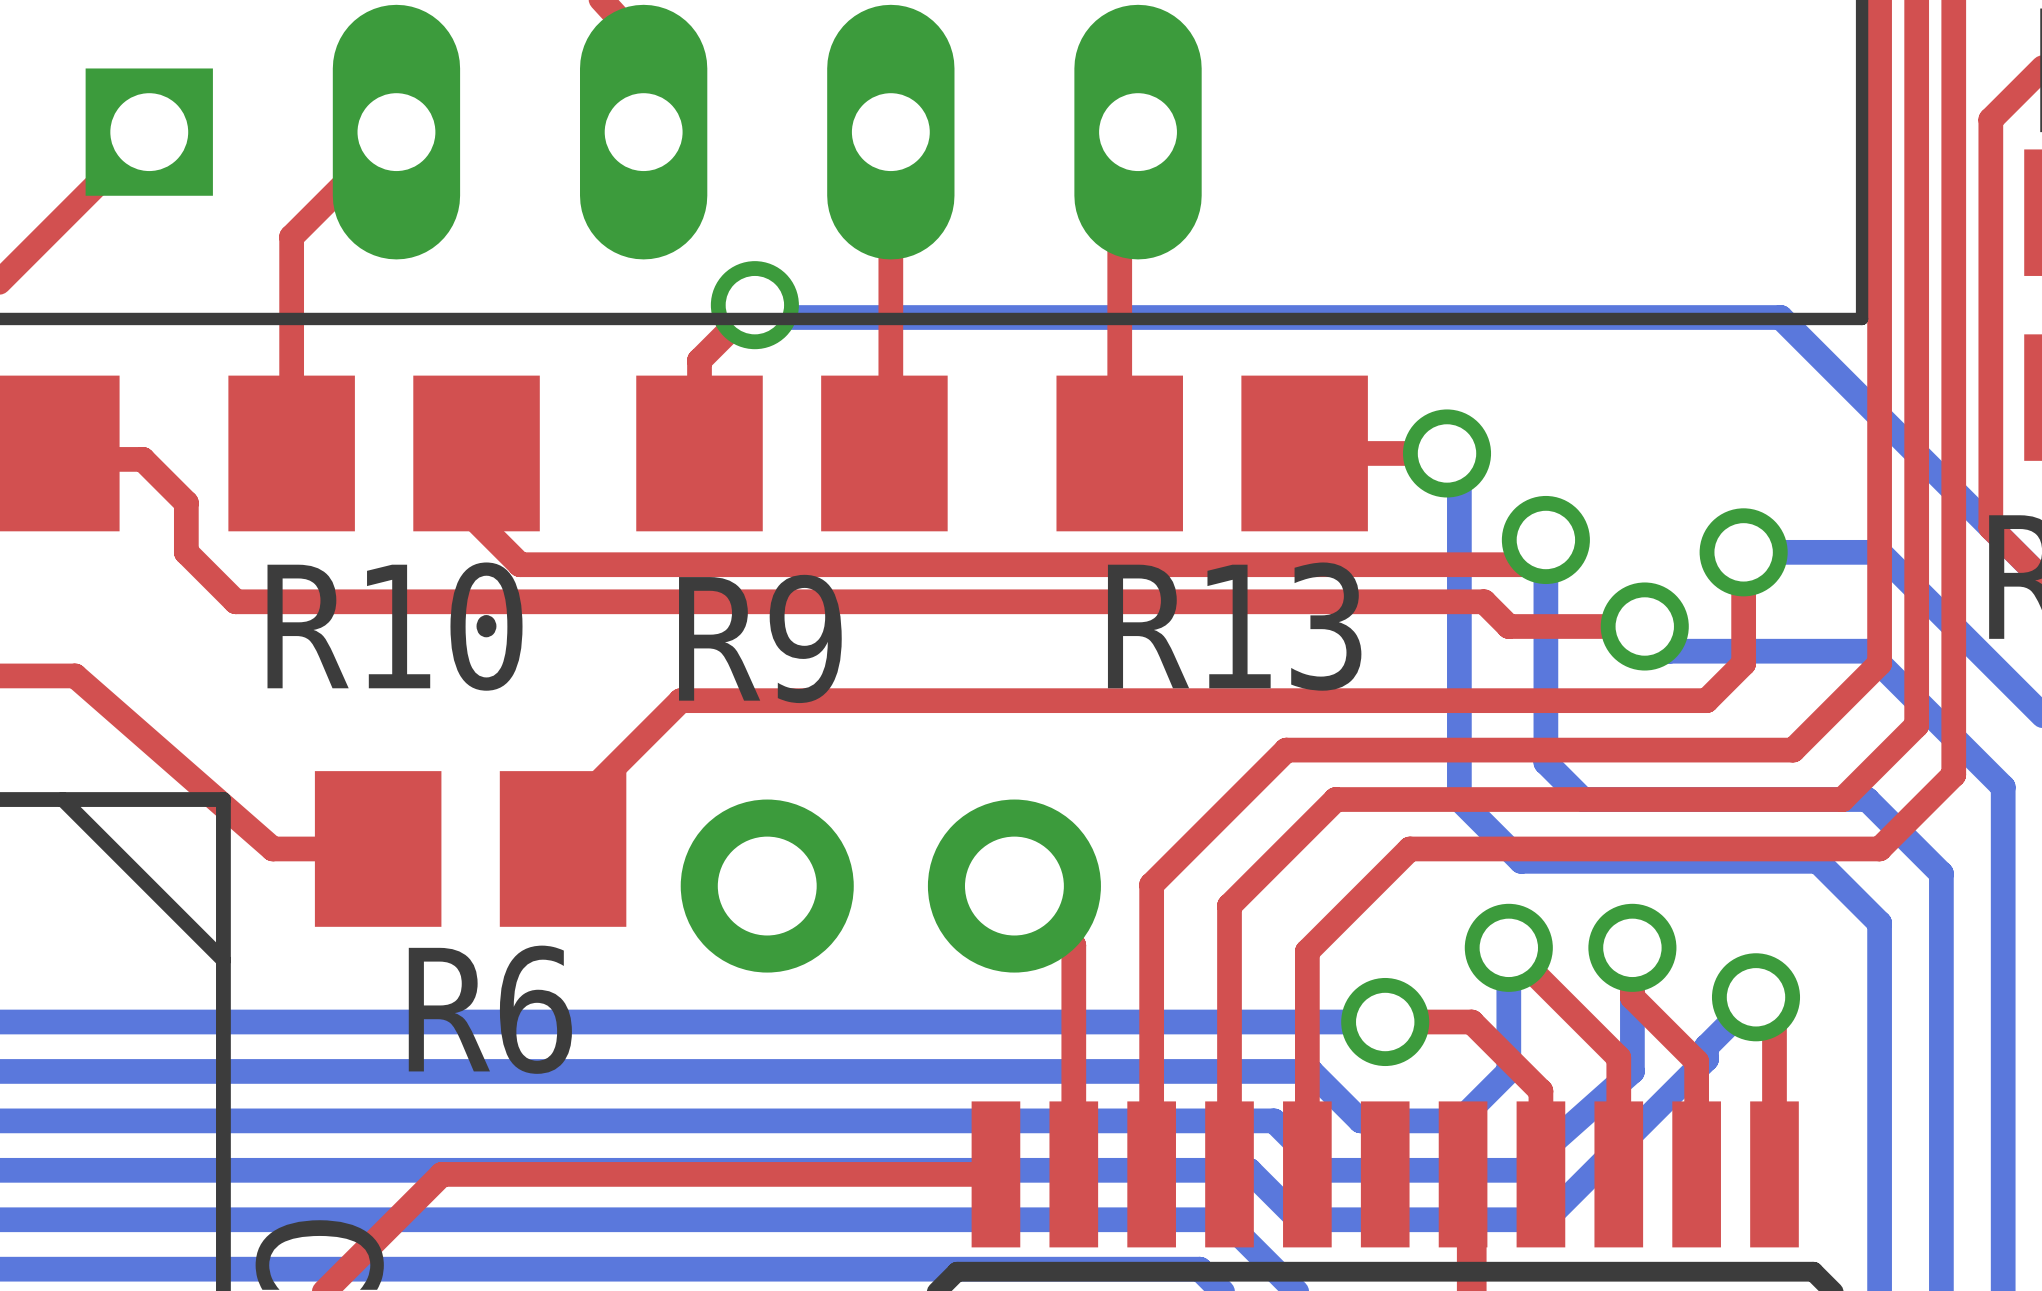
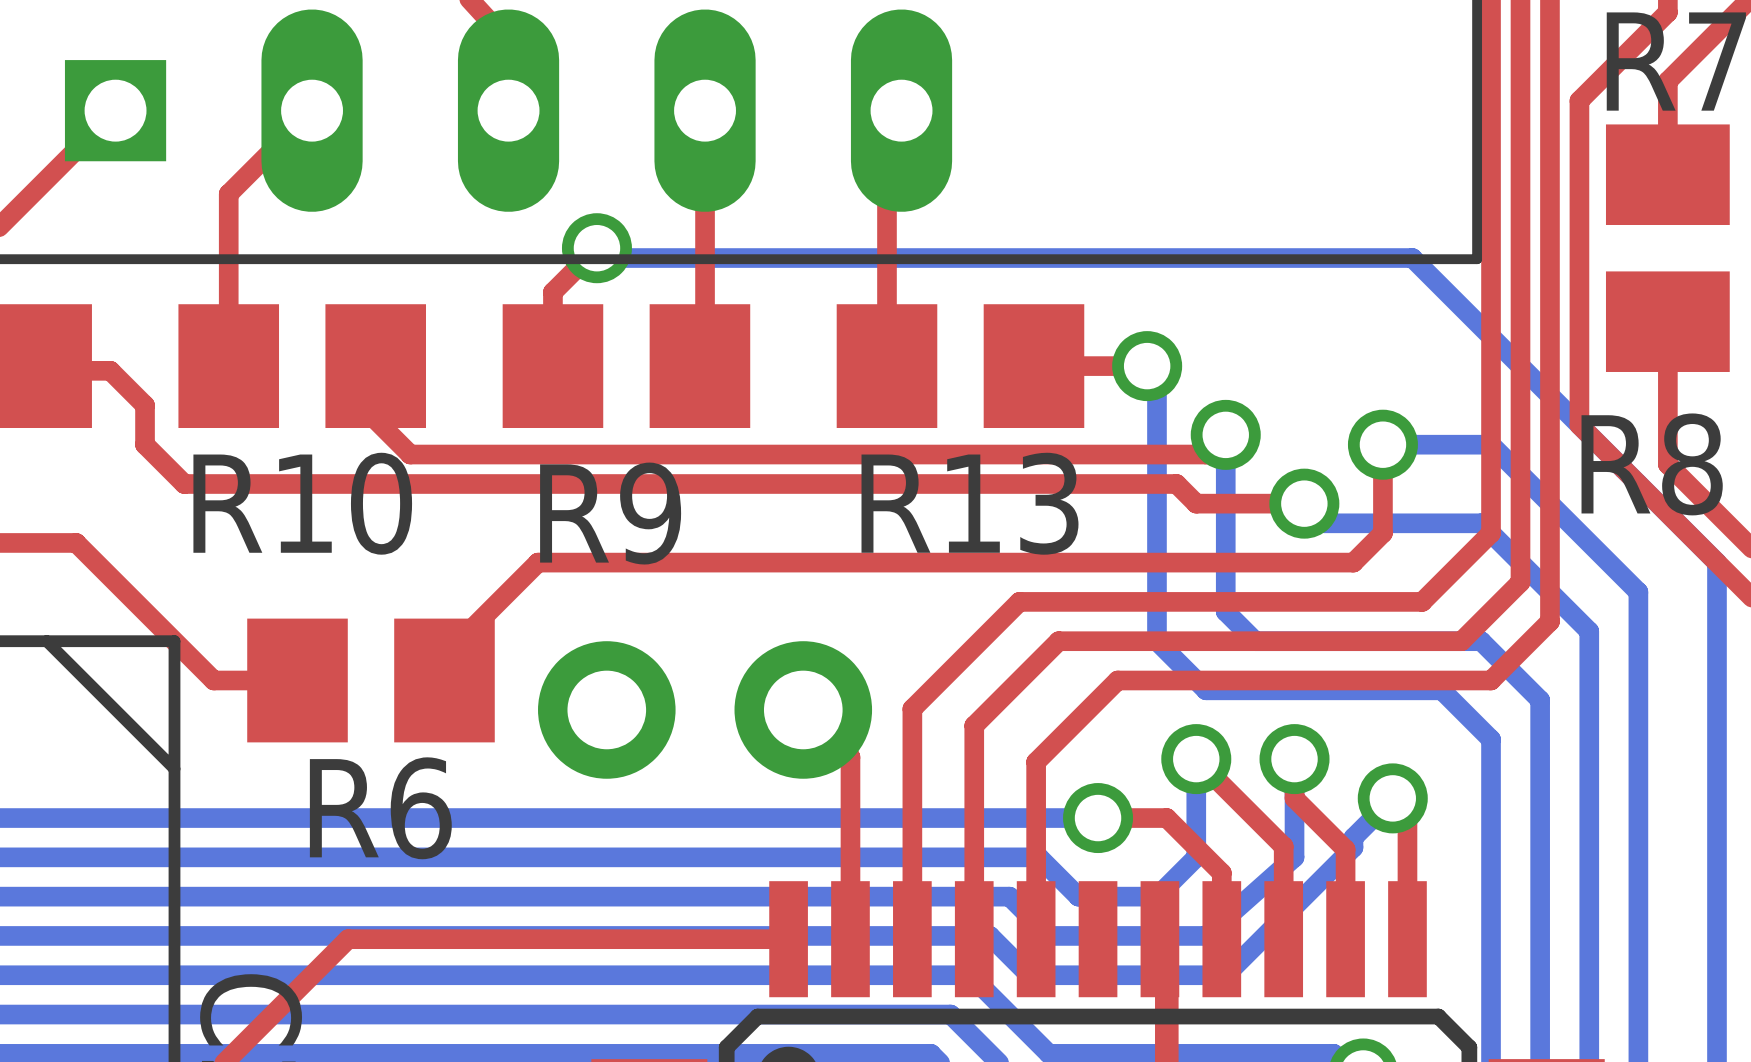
top track: (75, 675) (272, 848) -> (56, 542) (76, 542) (213, 680)

